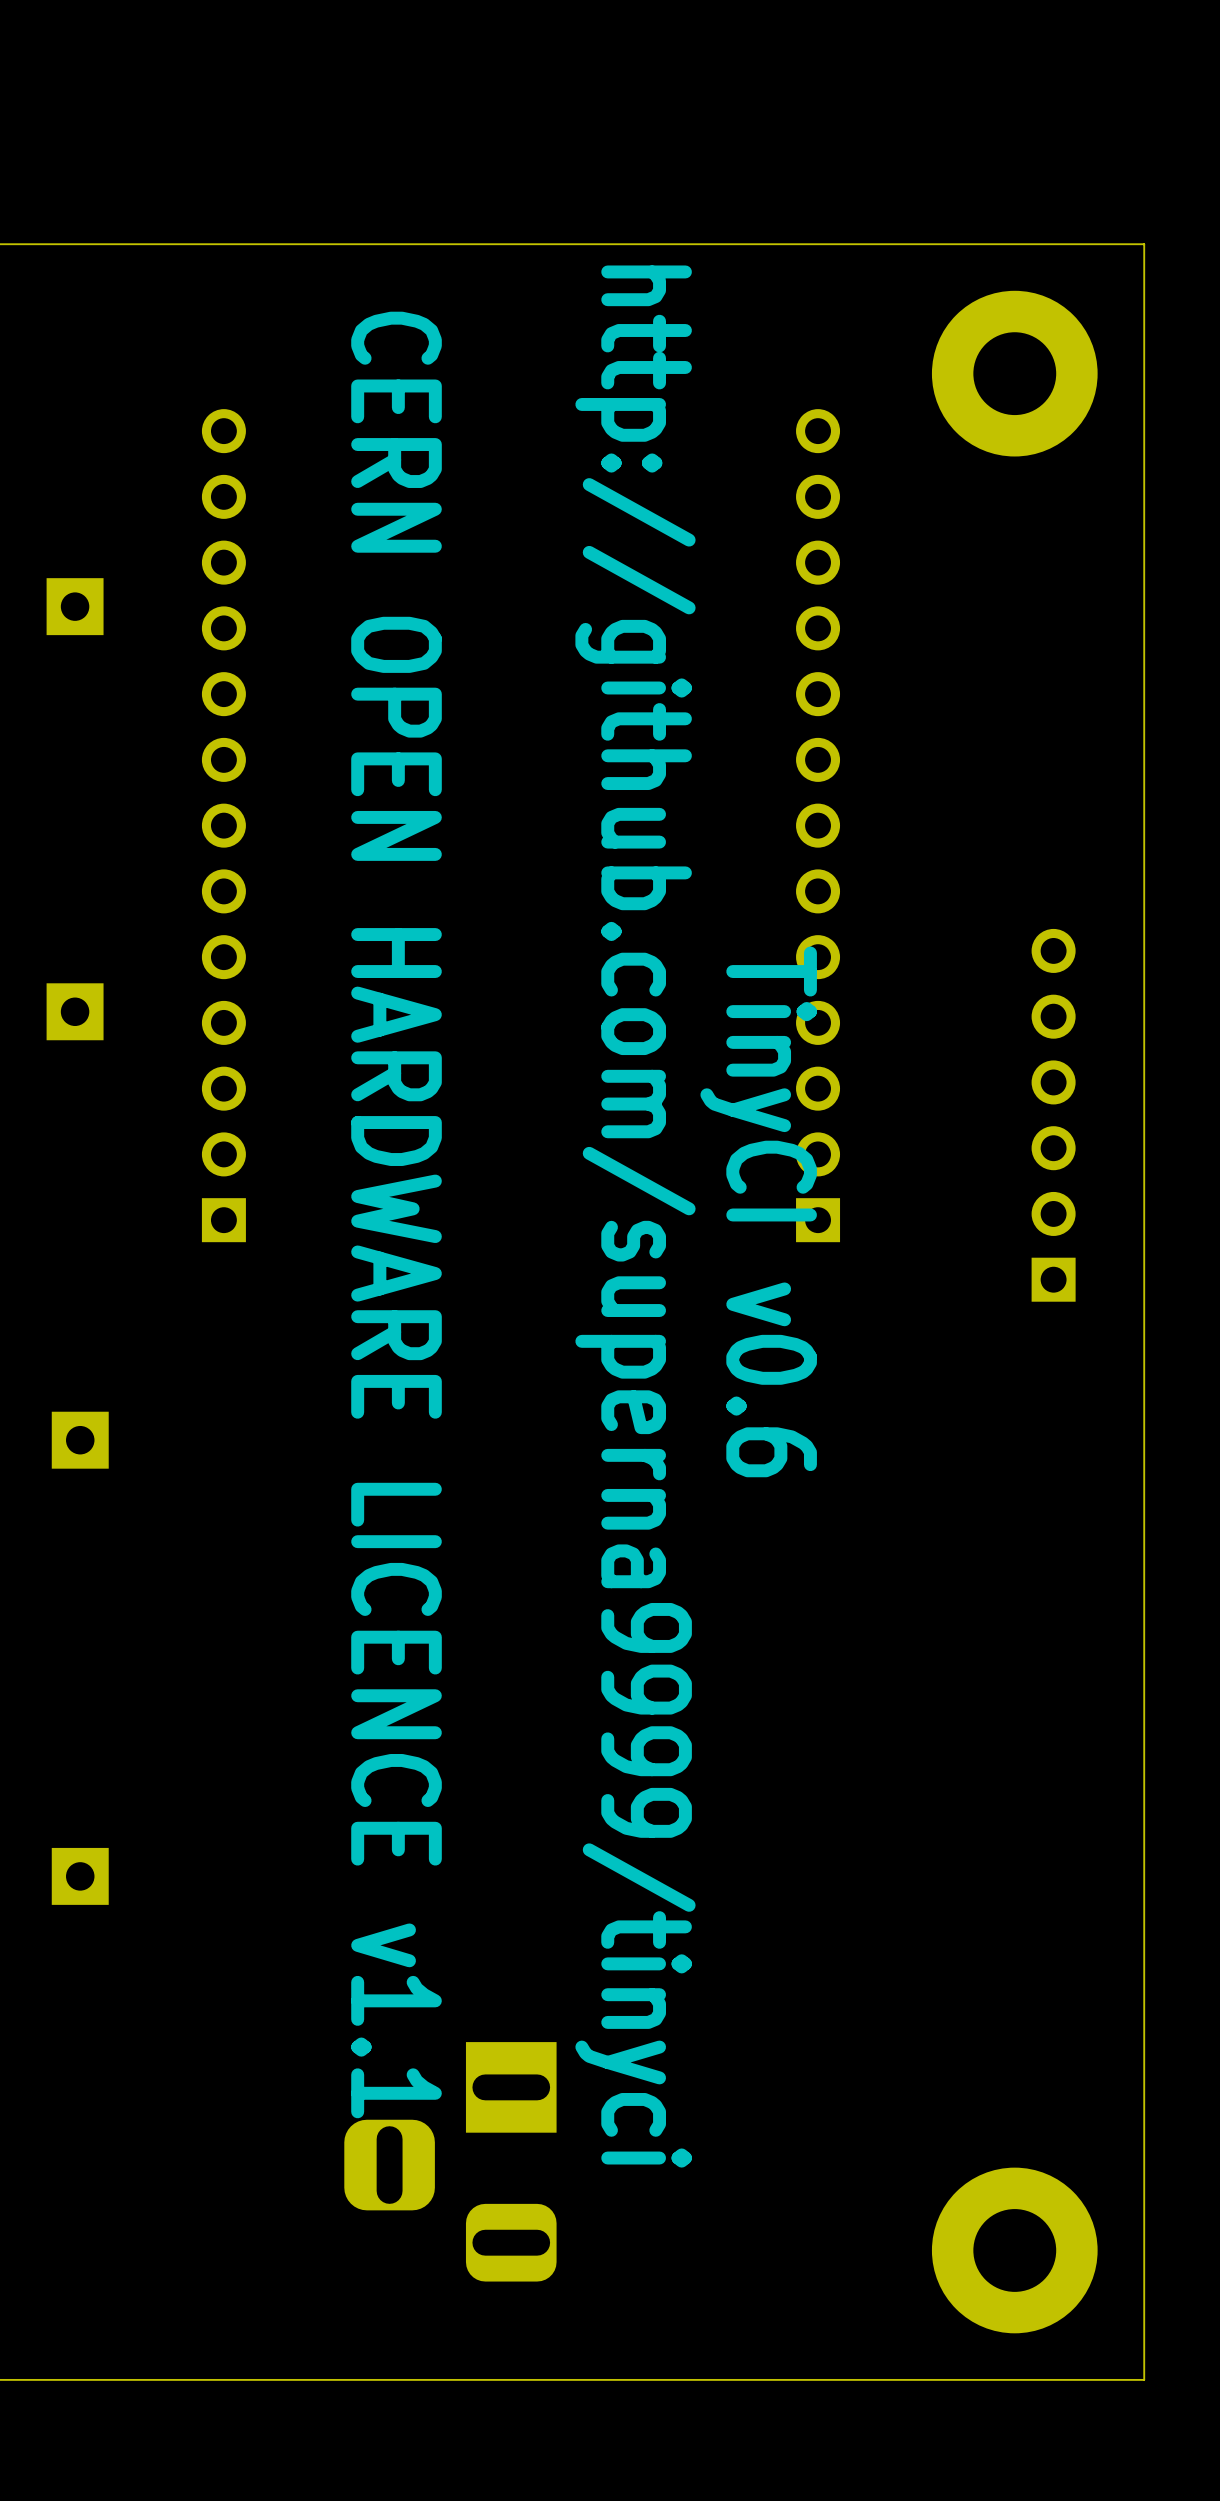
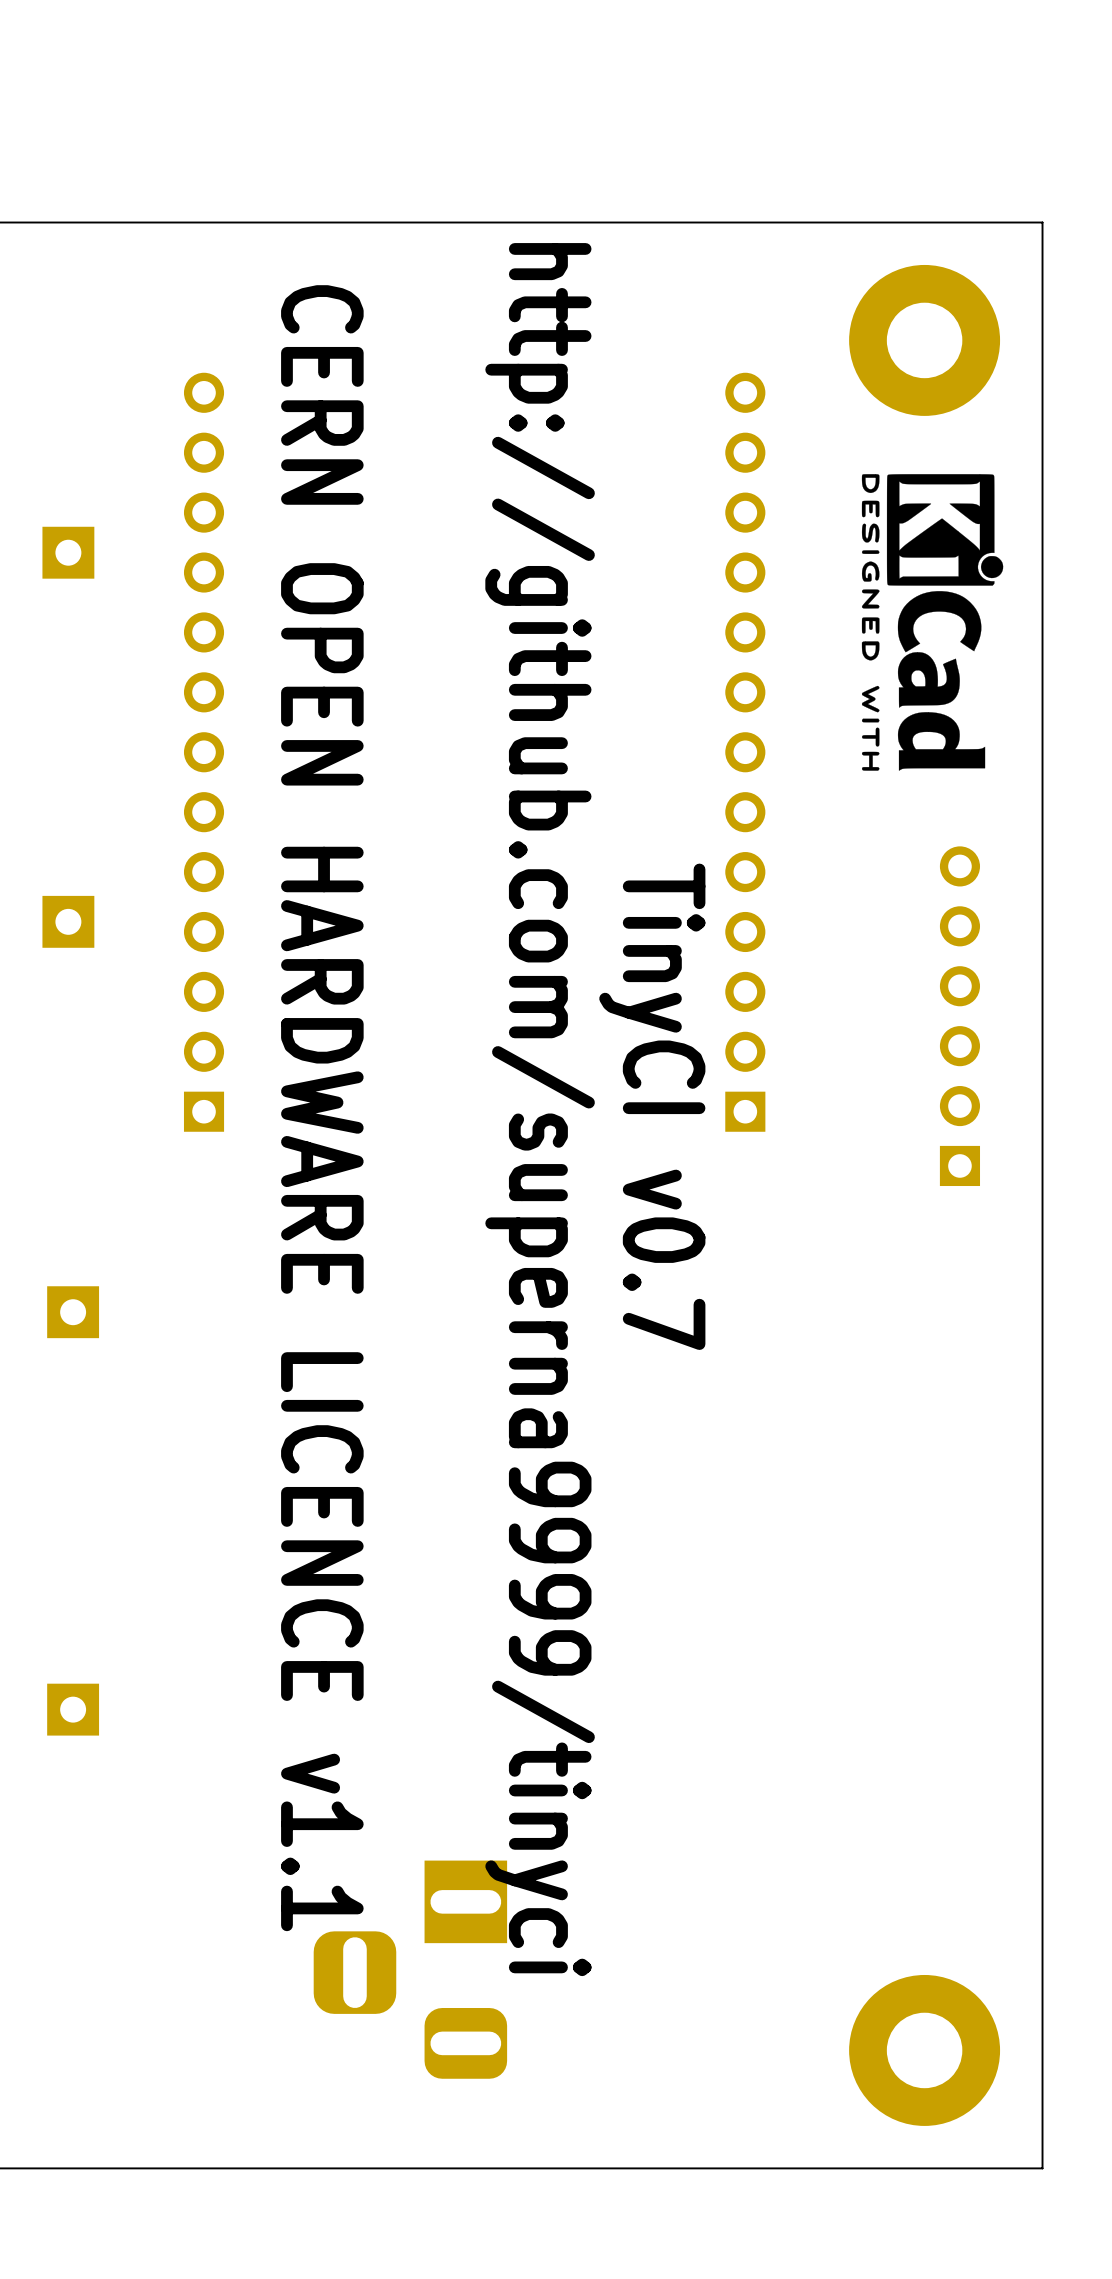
drawing: none -> [861, 474, 1004, 771]
text: TinyCI v0.6 (758, 1211) -> TinyCI v0.7 (652, 1106)
text position: CERN OPEN HARDWARE LICENCE v1.1 (396, 1214) -> CERN OPEN HARDWARE LICENCE v1.1 (322, 1108)
text position: http://github.com/superna9999/tinyci (635, 1216) -> http://github.com/superna9999/tinyci (540, 1109)

